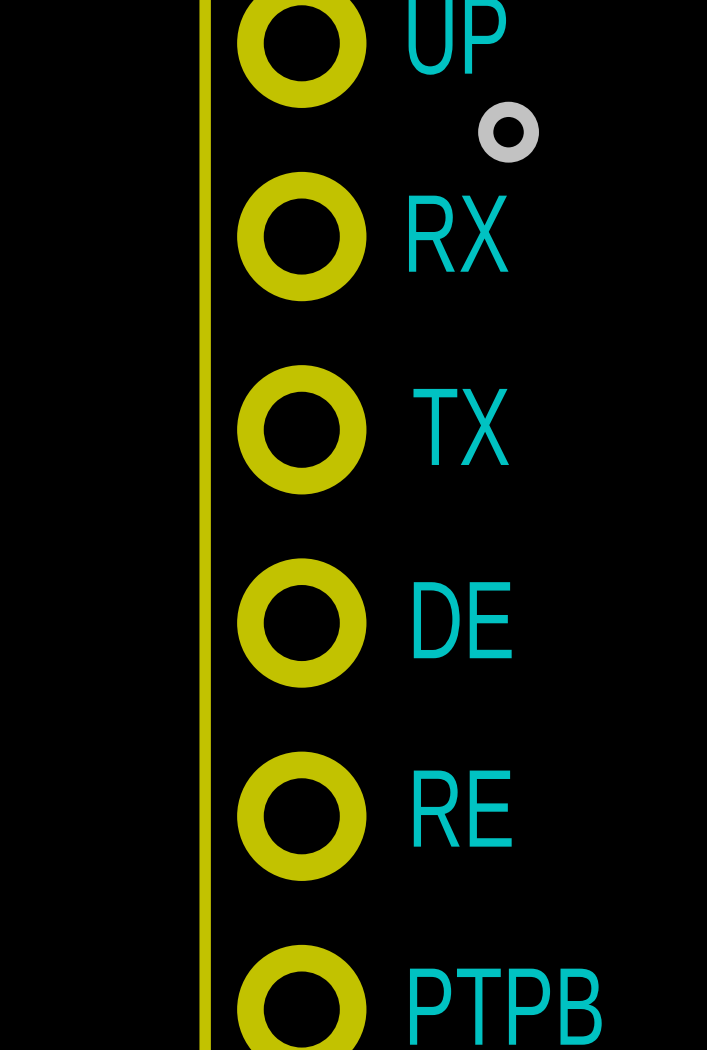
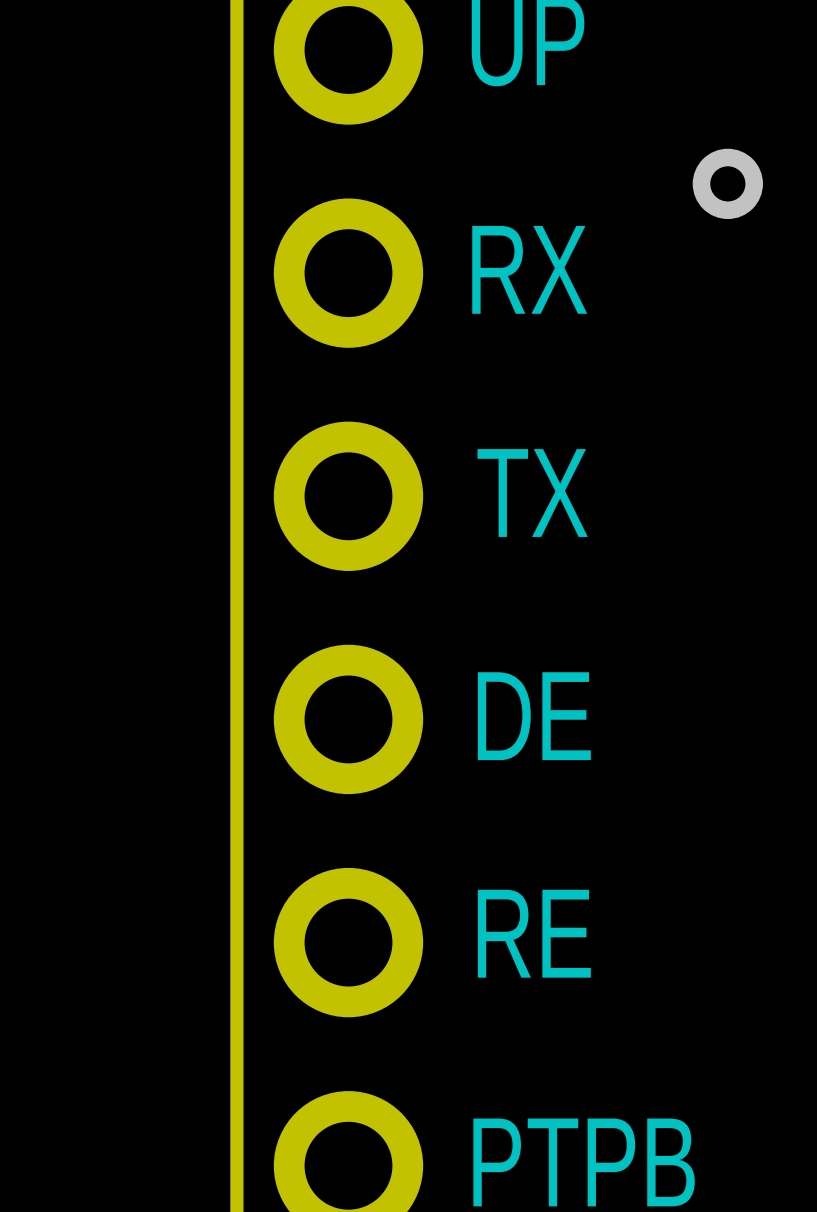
via: (508, 132) -> none
via: none -> (727, 183)

